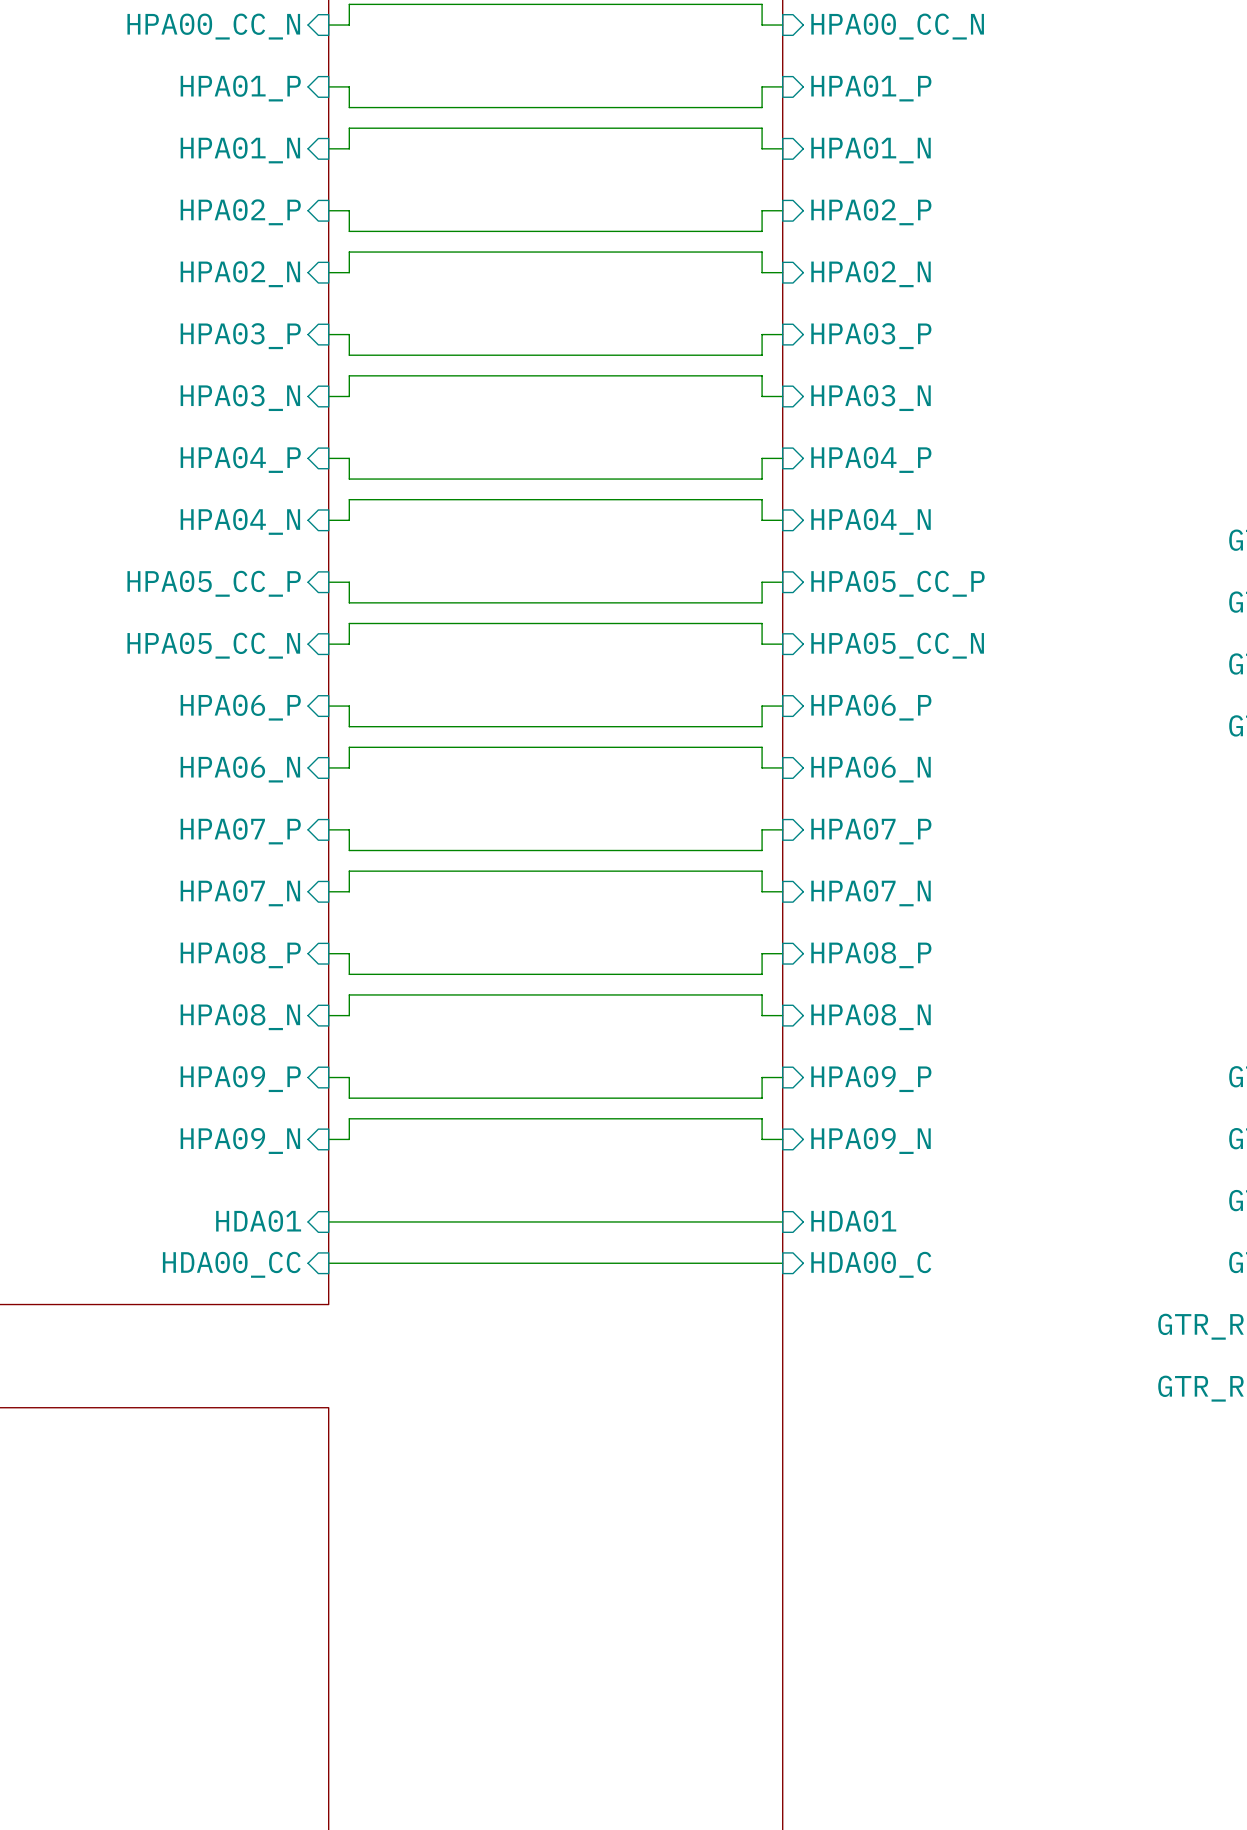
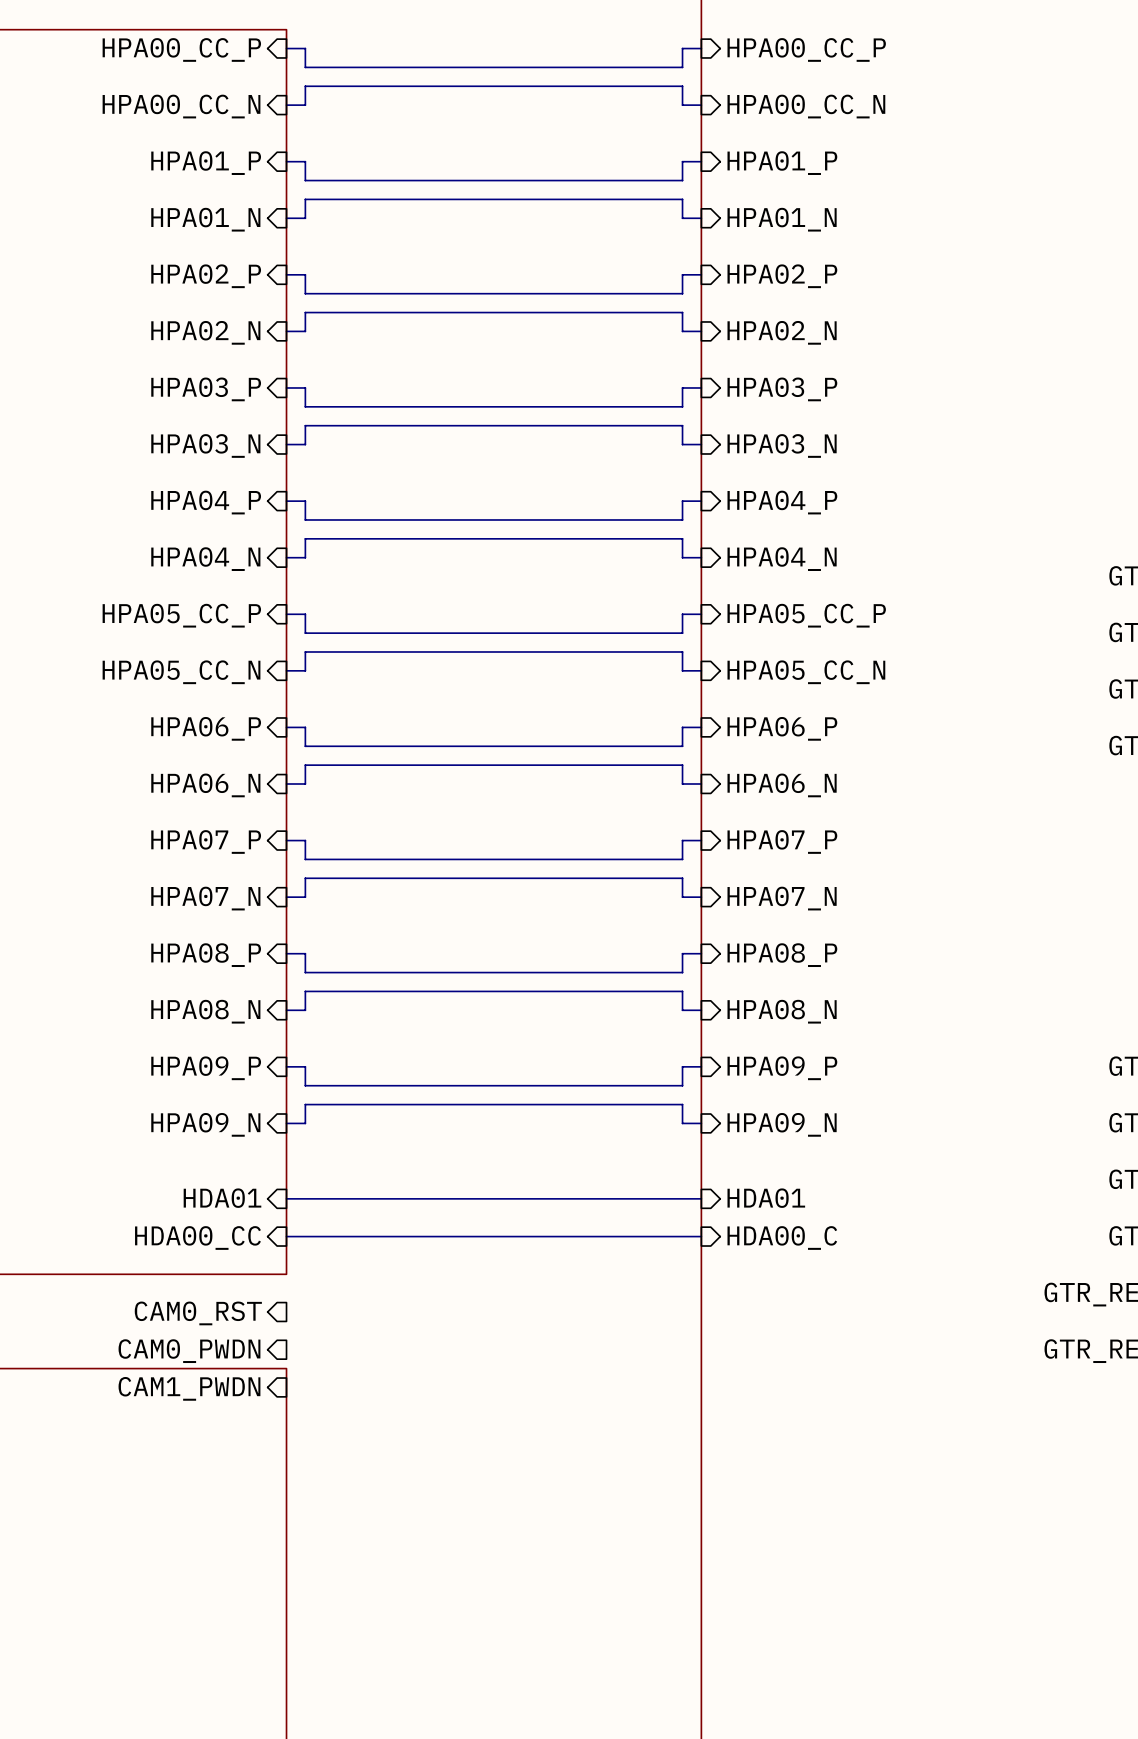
sheet pin: none -> CAM0_RST (198, 1313)
sheet pin: none -> CAM0_PWDN (189, 1351)
sheet pin: none -> CAM1_PWDN (189, 1388)

